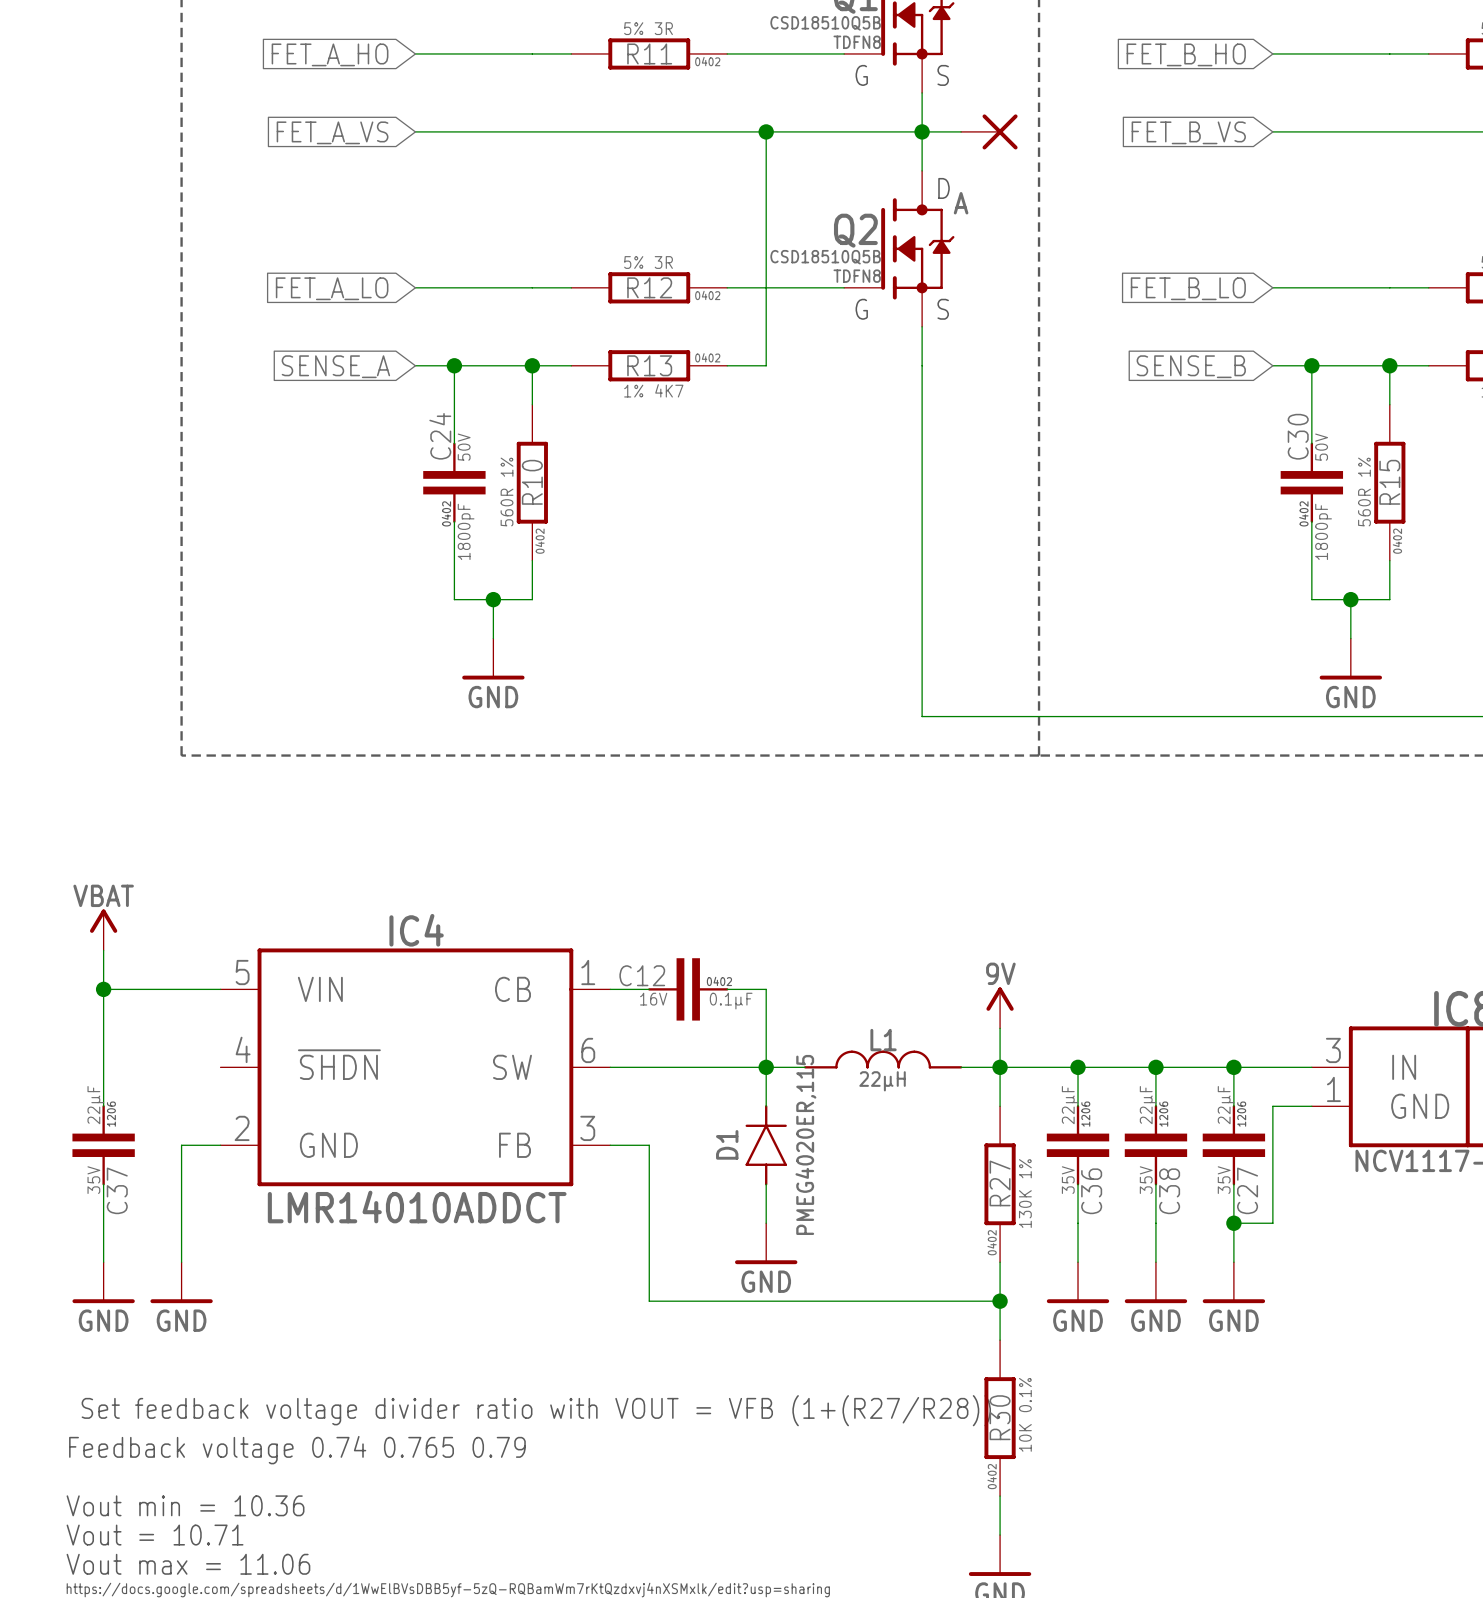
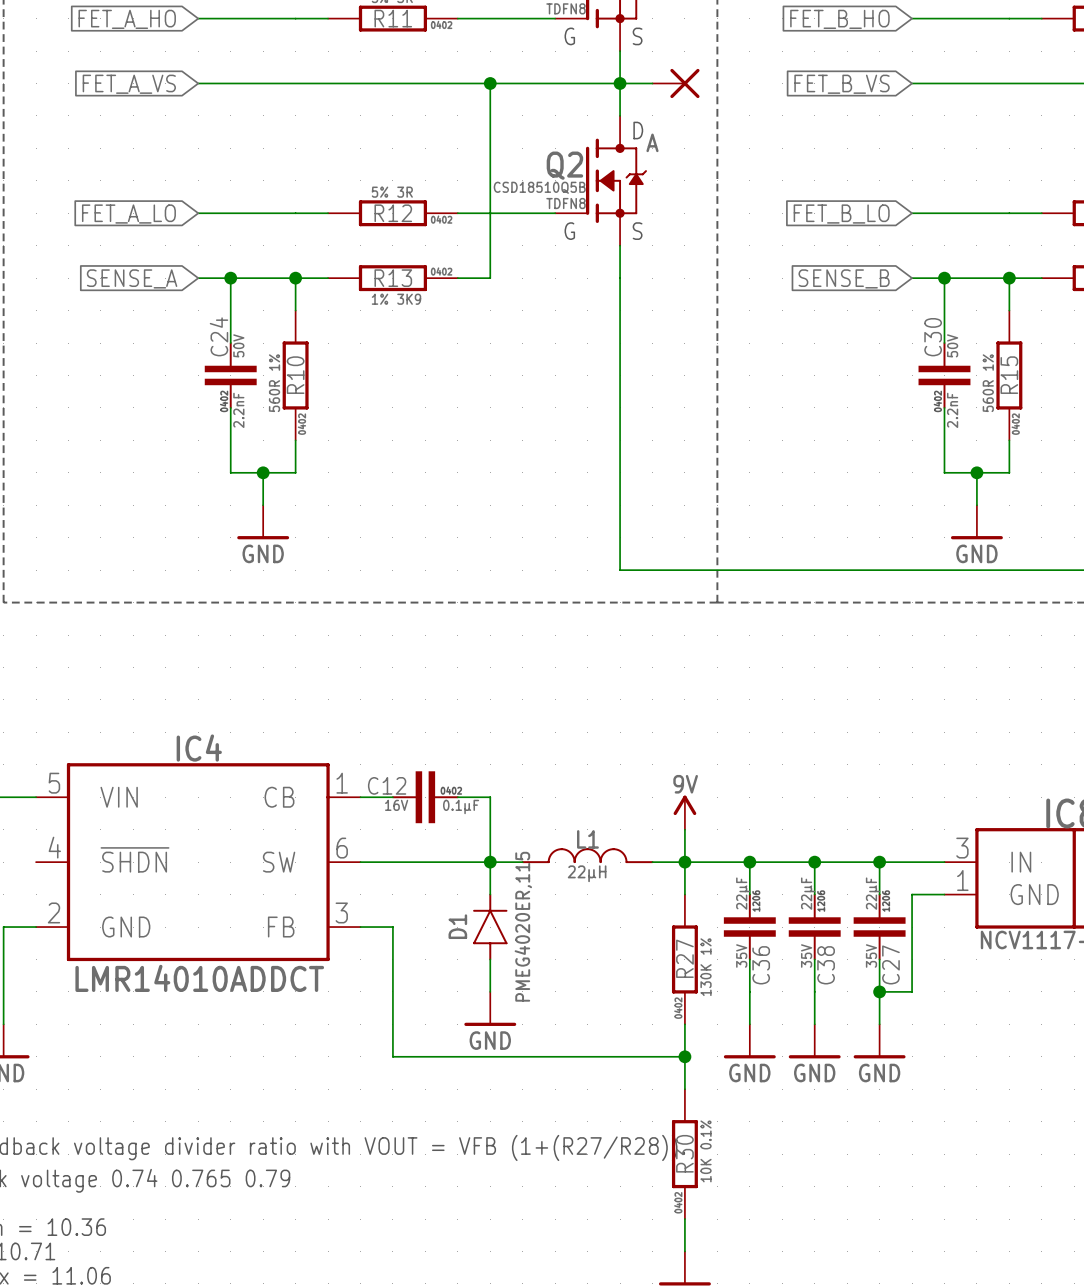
R13 value: 4K7 (669, 390) -> 3K9 (409, 299)
C24 value: 1800pF (466, 531) -> 2.2nF (238, 410)
C30 value: 1800pF (1323, 531) -> 2.2nF (952, 410)

